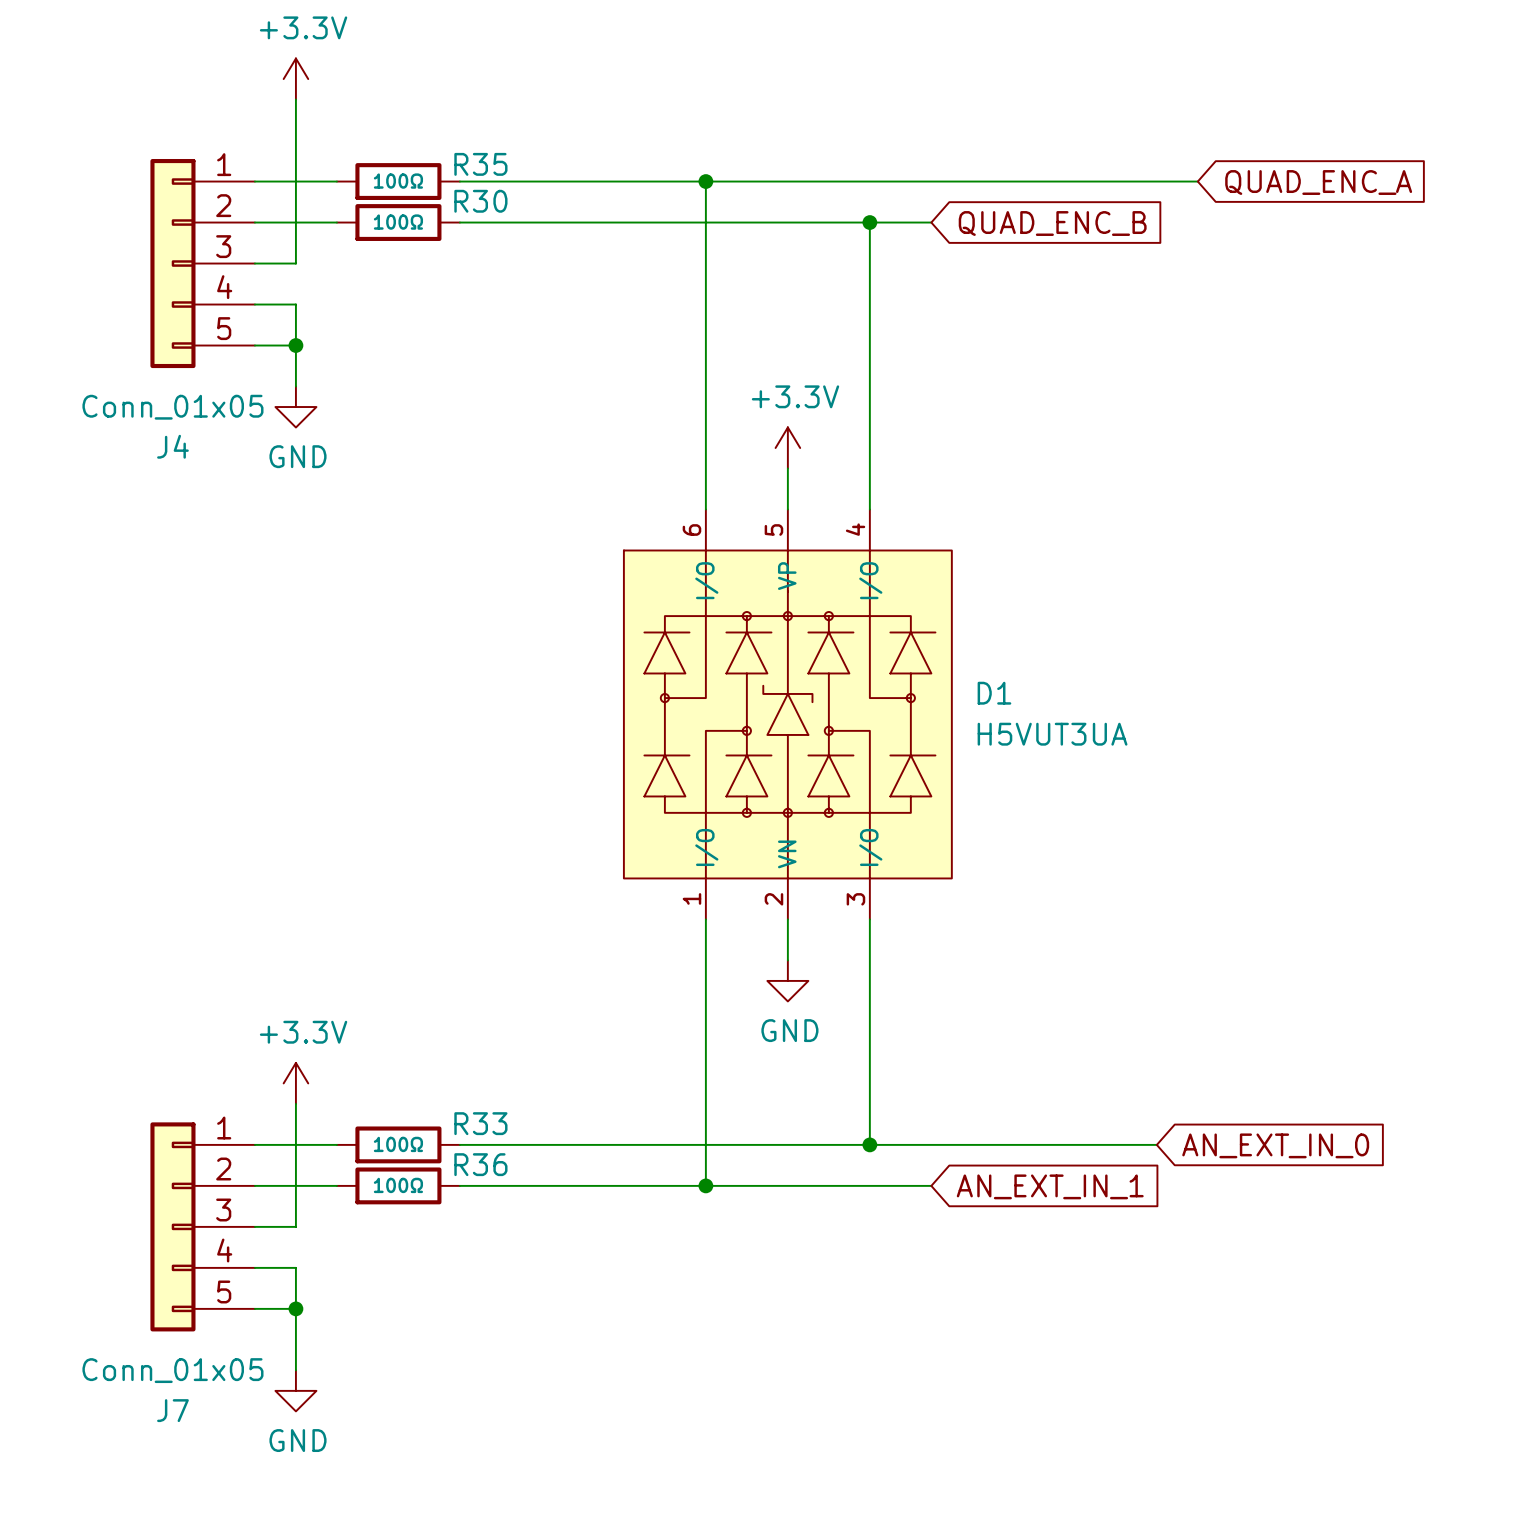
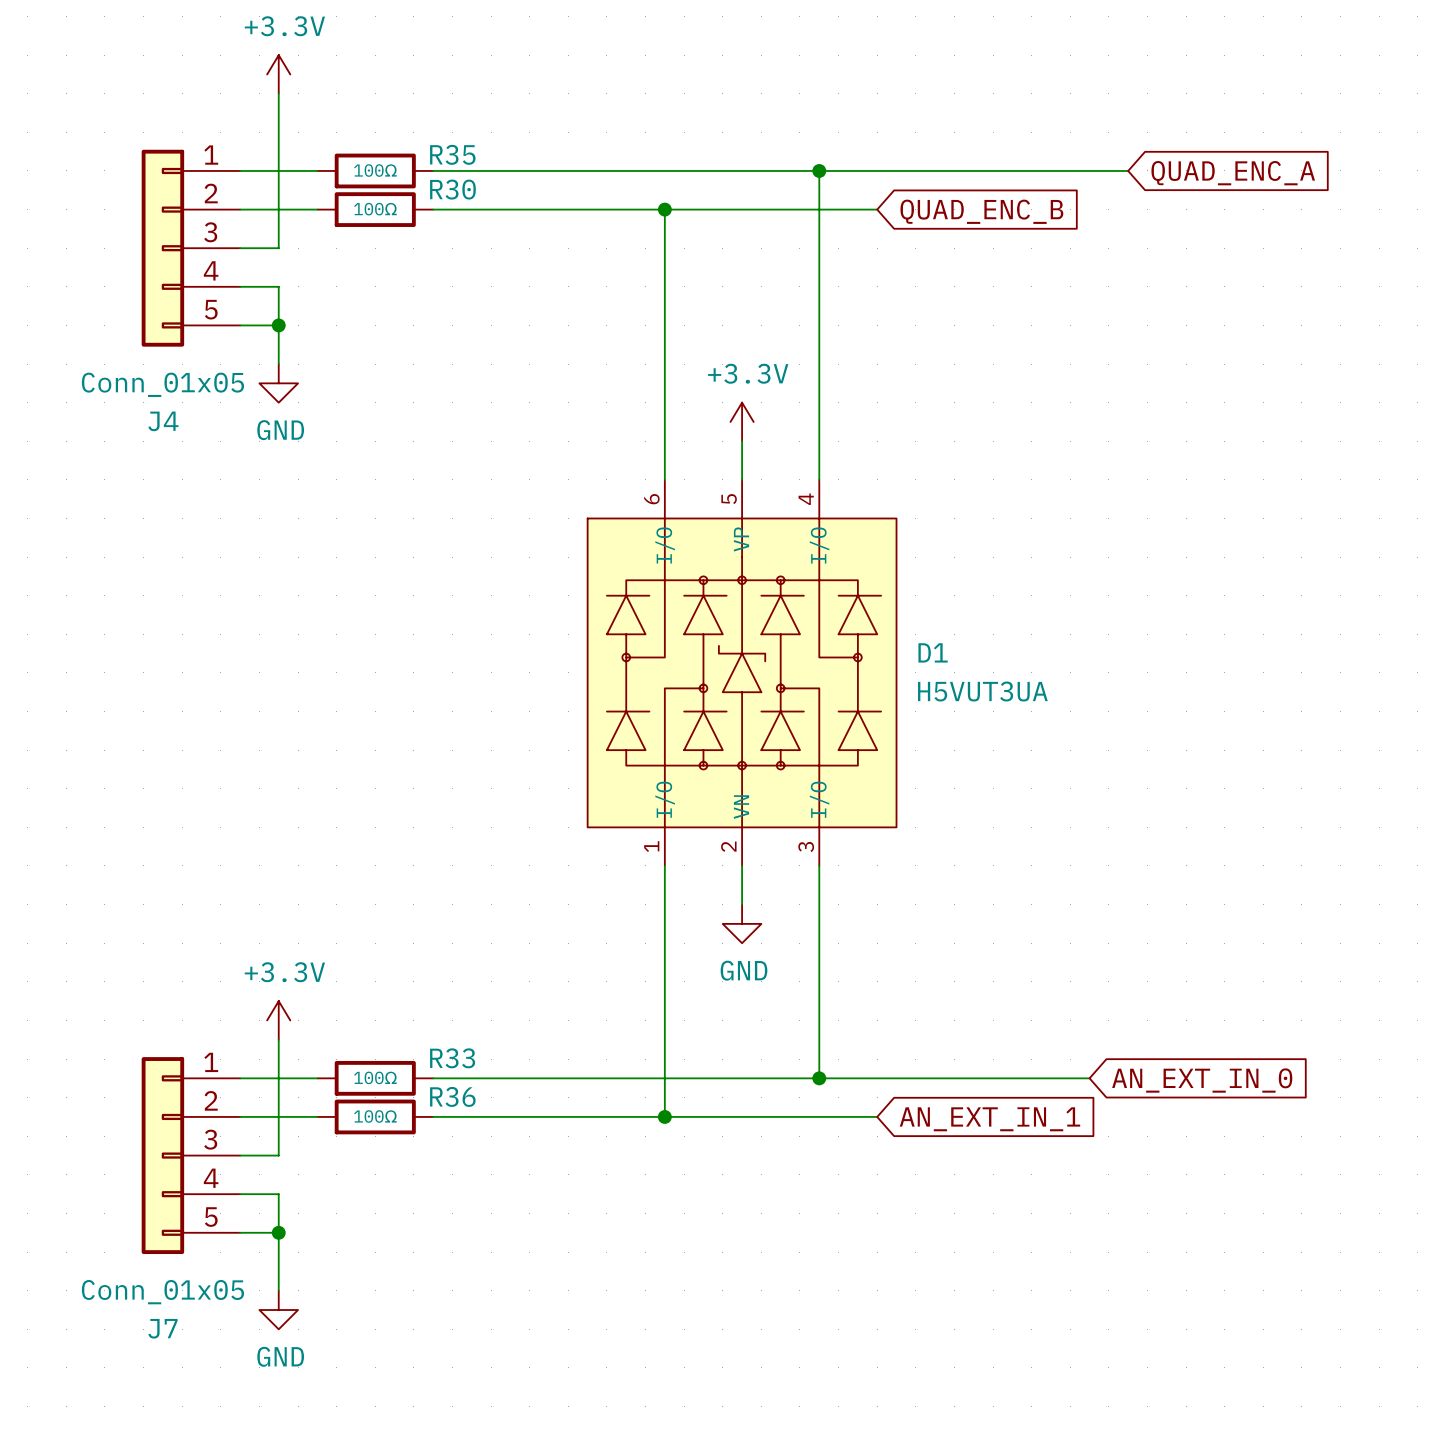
wire: (705, 181) (705, 222) -> (819, 170) (819, 209)
junction position: (705, 181) -> (664, 209)
junction position: (869, 222) -> (819, 170)

